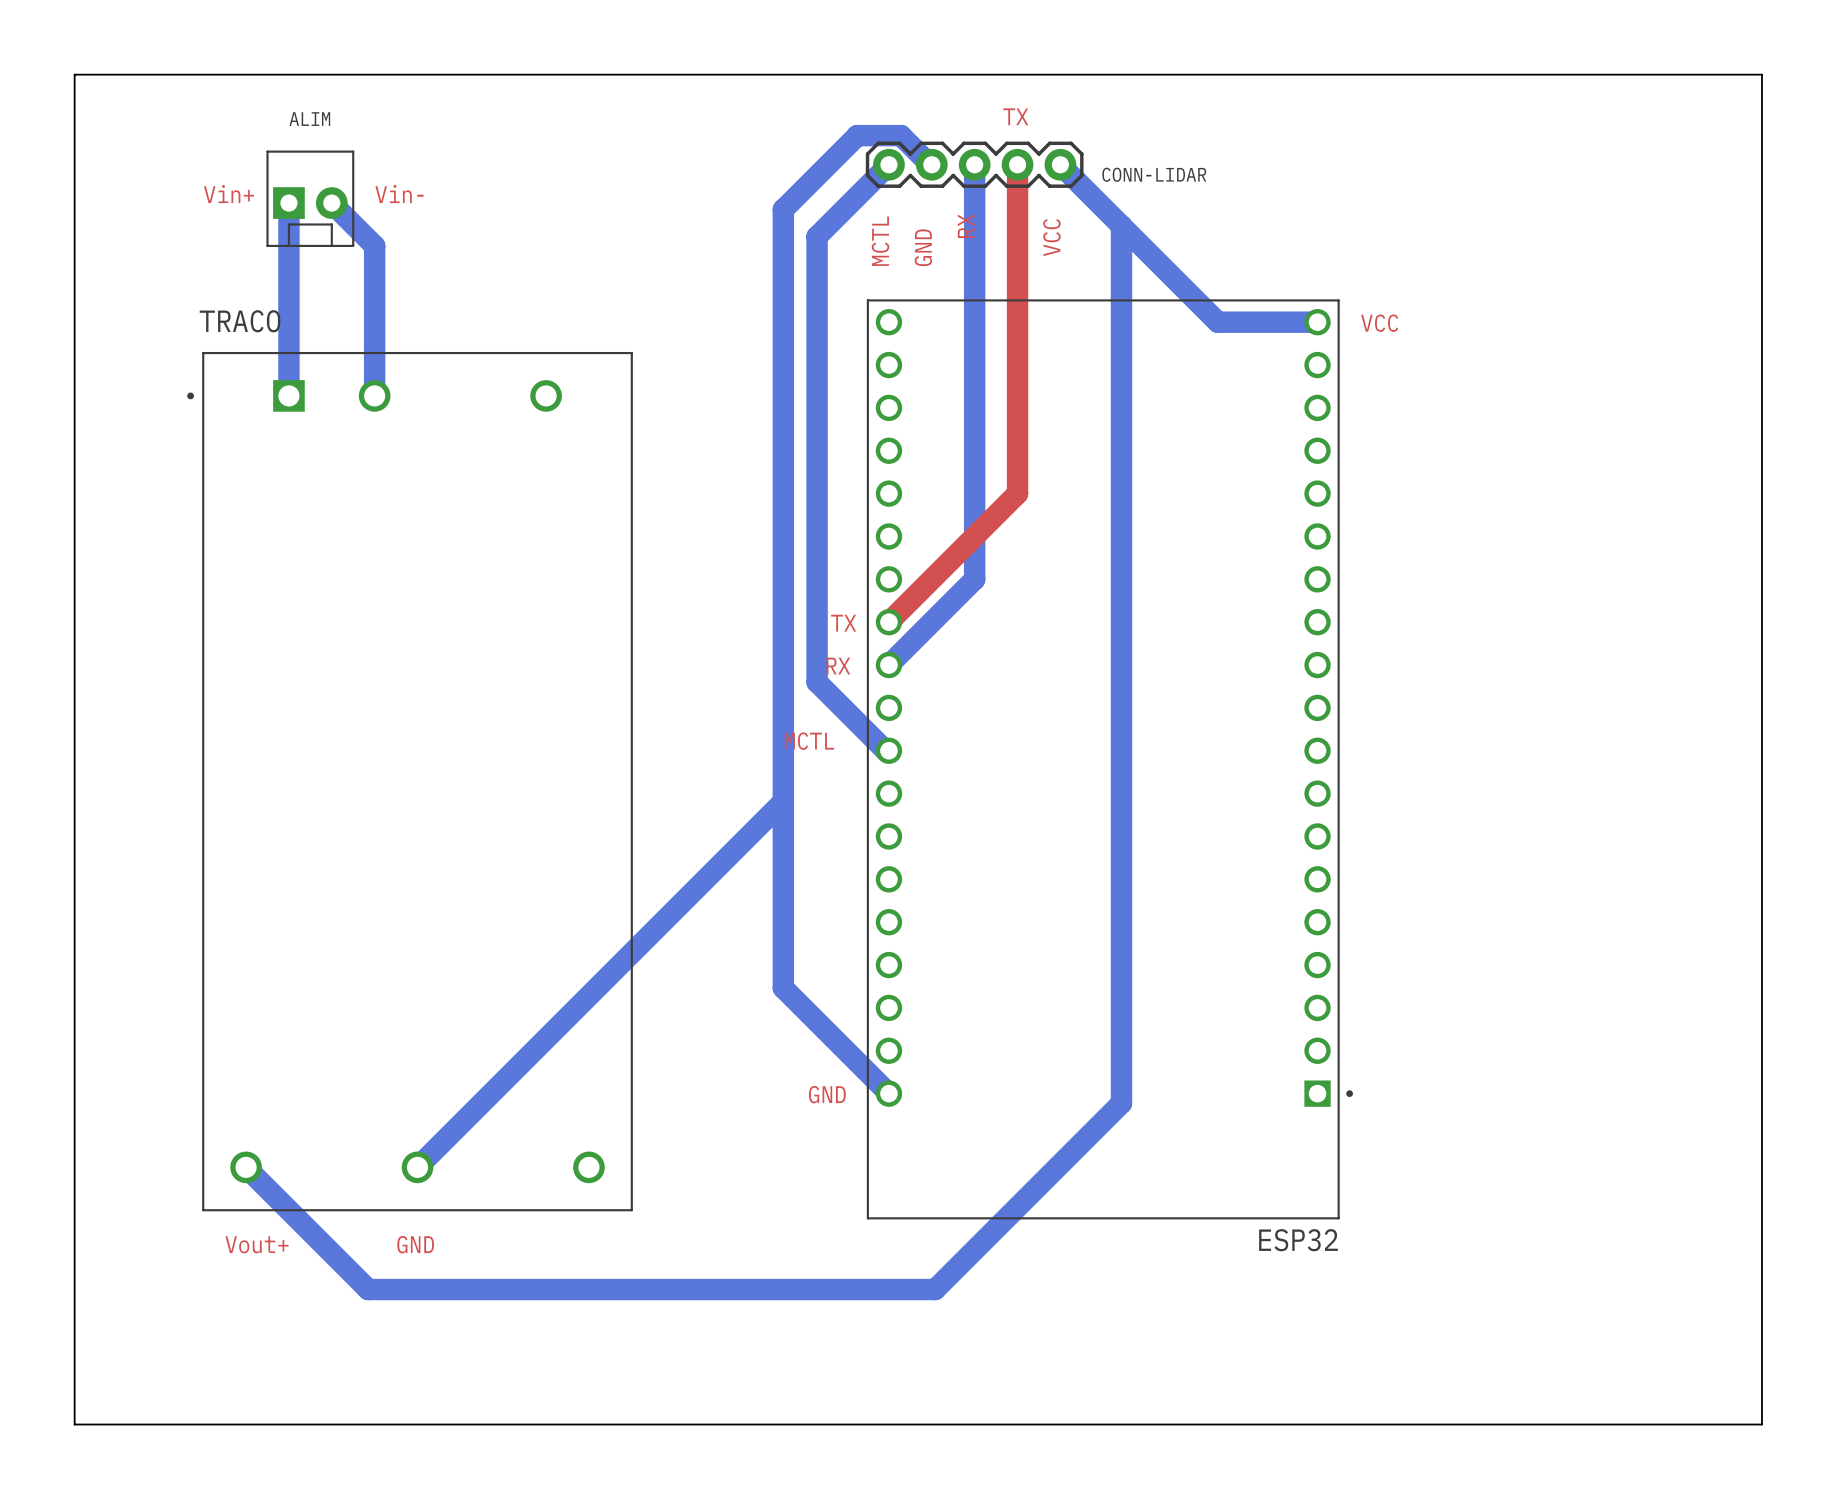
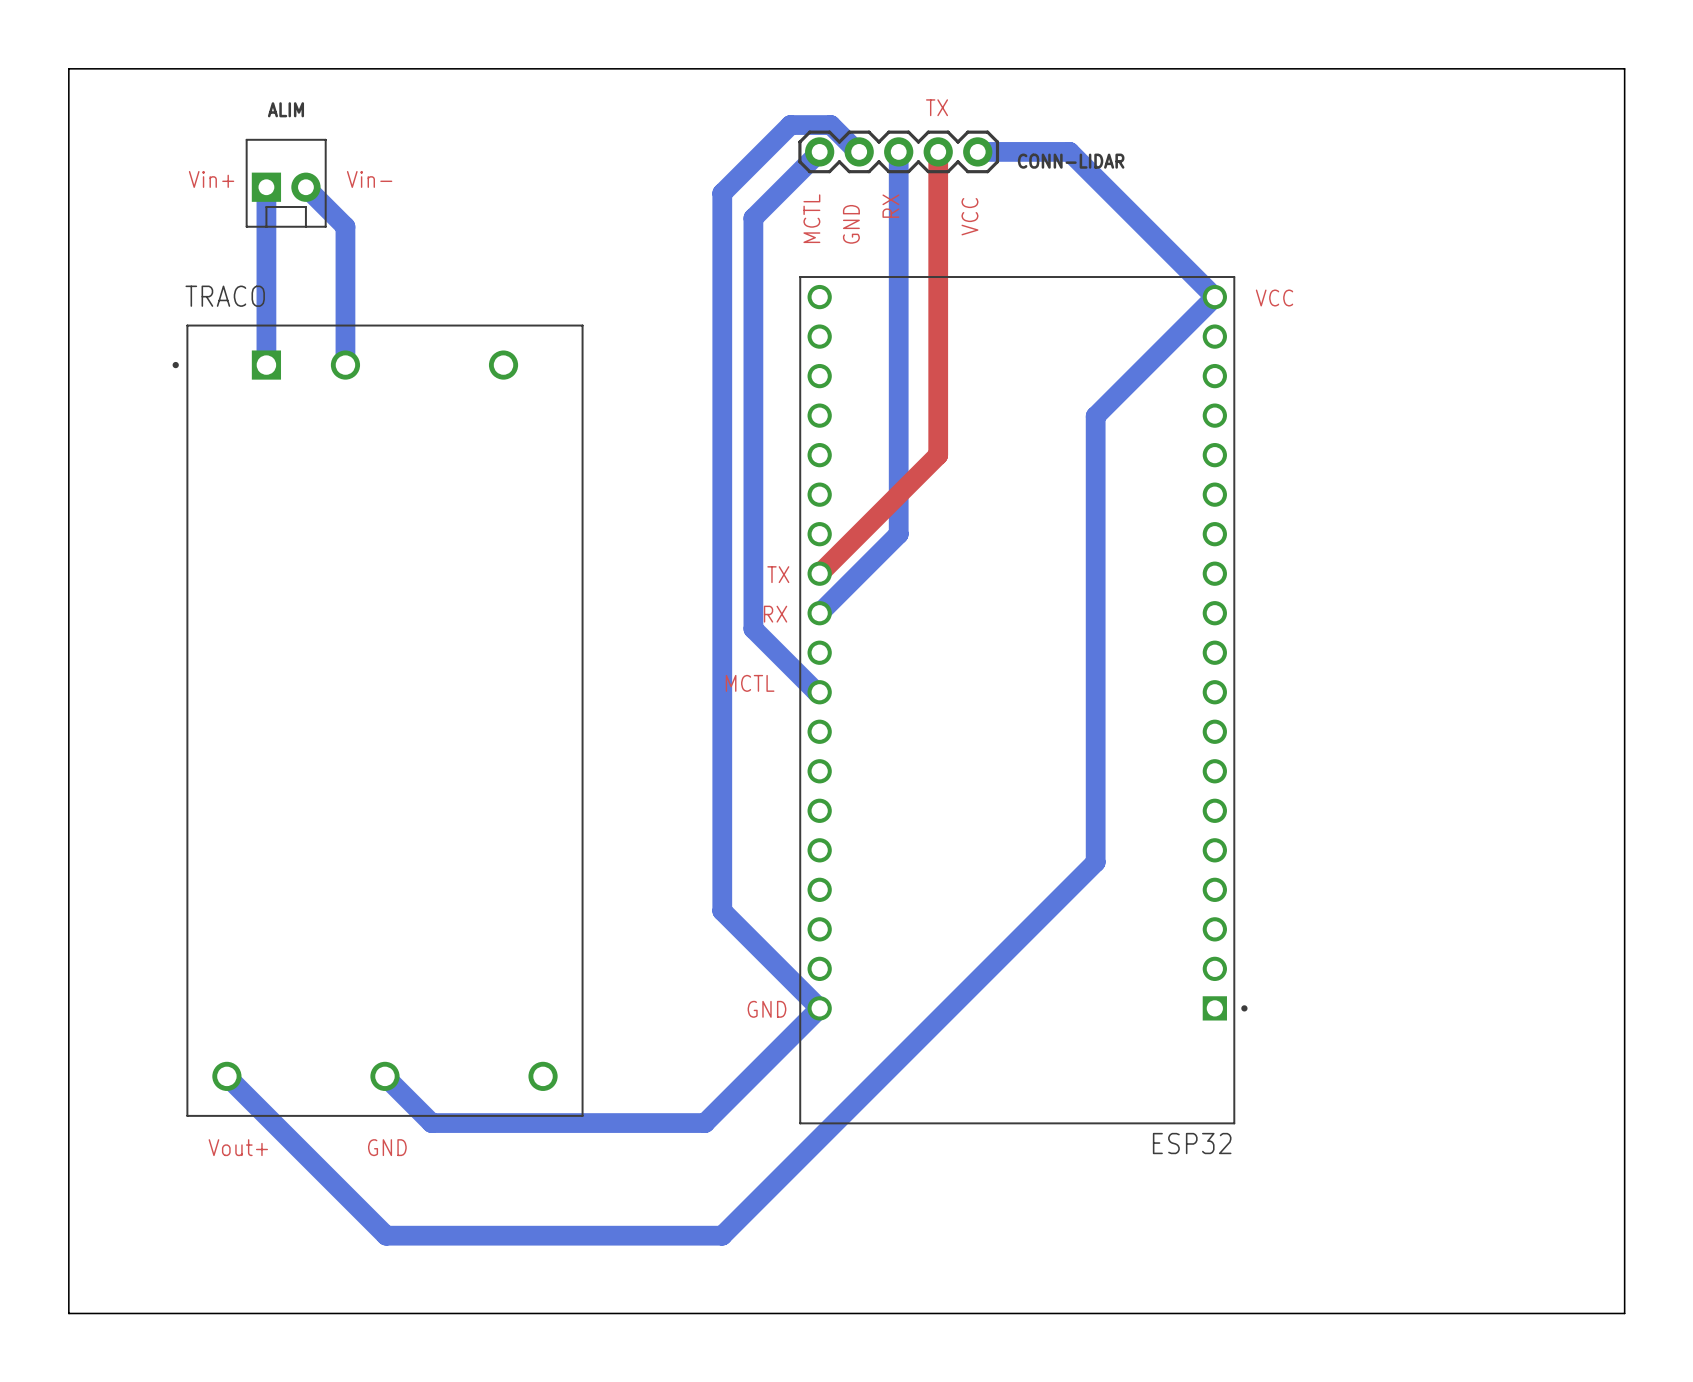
bottom track: (1060, 164) (1217, 322) (1317, 322) -> none
bottom track: (1121, 225) (1121, 1103) (935, 1289) (368, 1289) -> (977, 151) (1069, 151) (1214, 297) (1095, 416) (1095, 862) (722, 1235) (386, 1235) (339, 1189)
bottom track: (783, 801) (417, 1167) -> (819, 1008) (705, 1123) (431, 1123) (384, 1076)

